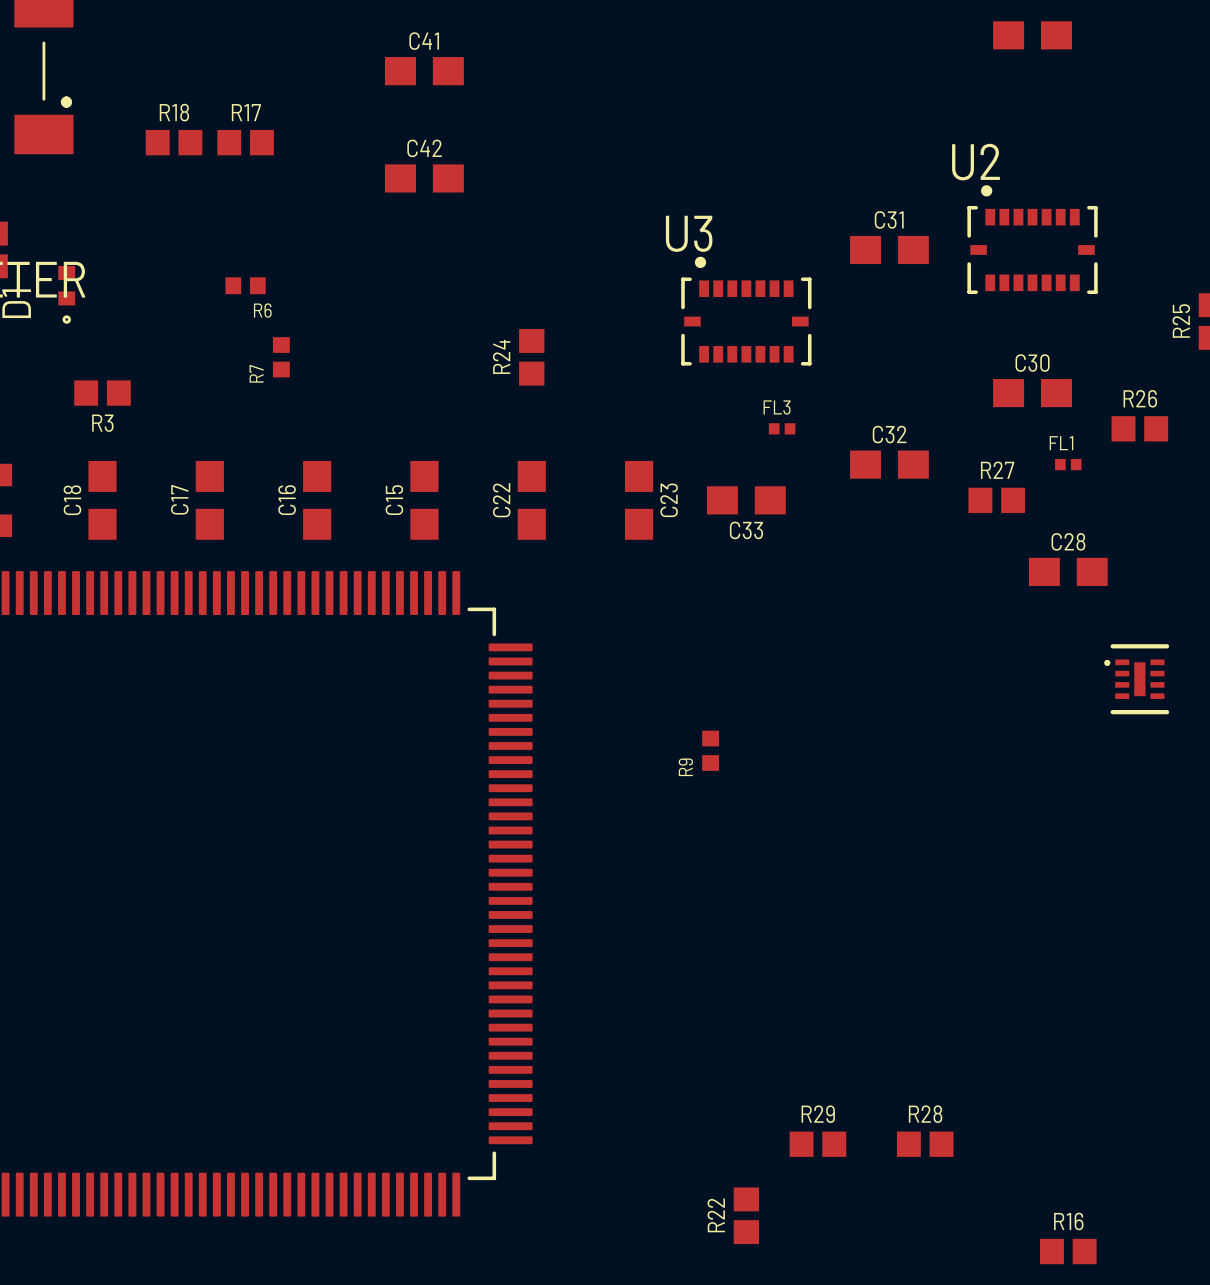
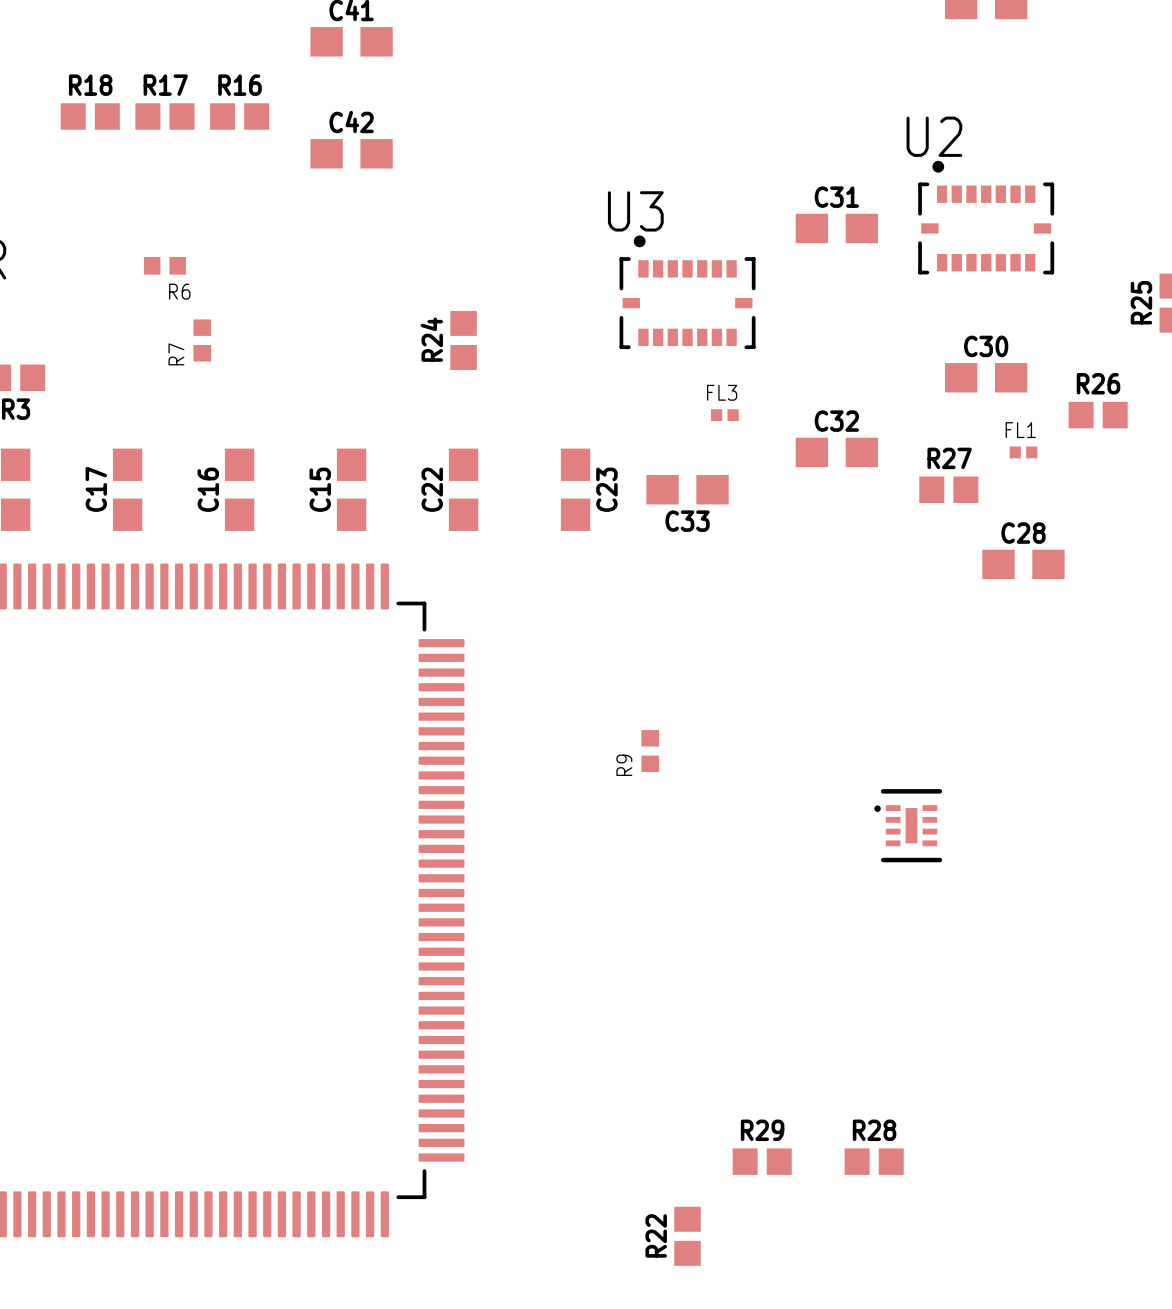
part position: (1136, 679) -> (908, 825)
R16 position: (1068, 1251) -> (239, 116)

